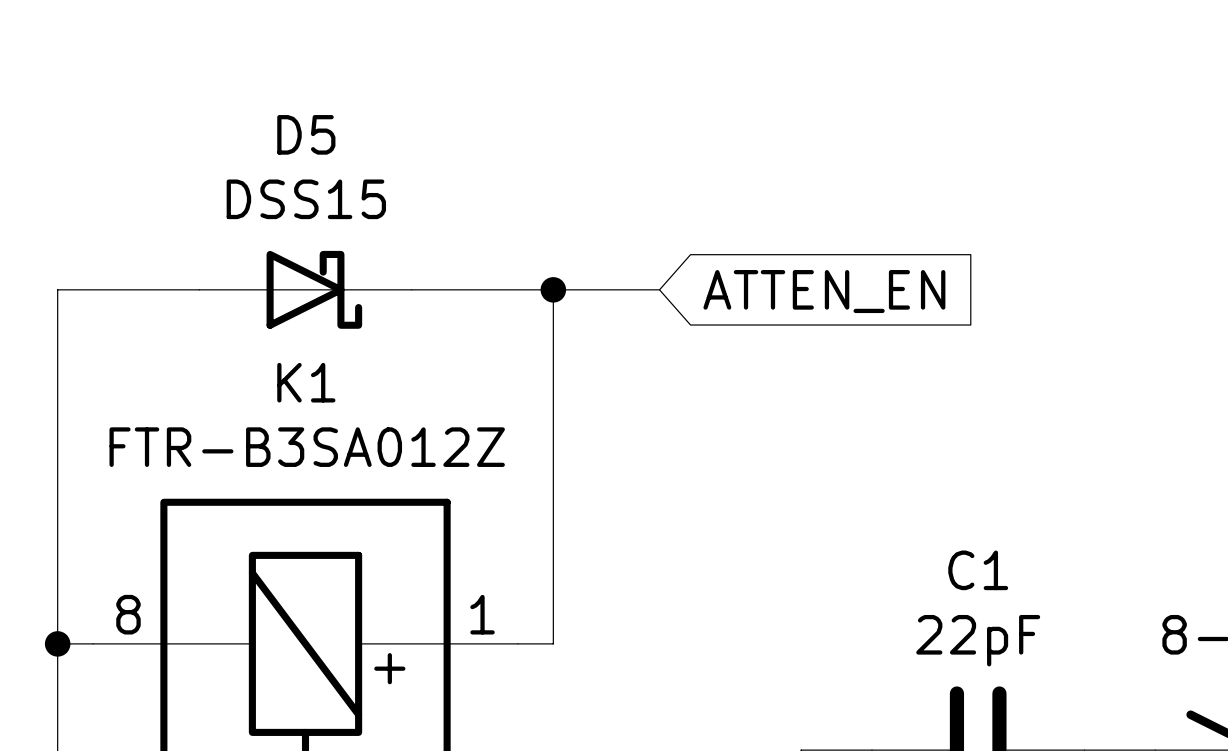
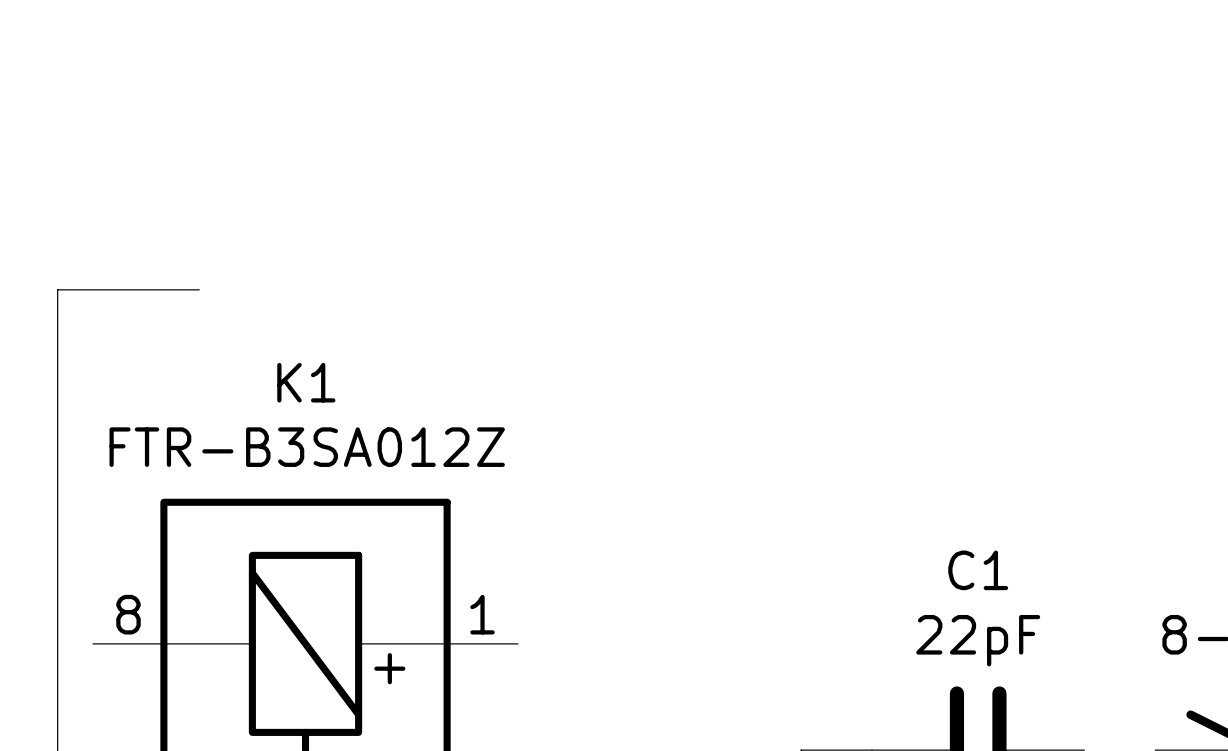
D5: DSS15 (305, 289) -> none
wire: (411, 289) (659, 289) -> none
wire: (553, 289) (553, 643) (517, 643) -> none
junction: (553, 289) -> none
global label: ATTEN_EN (824, 291) -> none
wire: (57, 643) (93, 643) -> none
junction: (57, 643) -> none
wire: (1084, 750) (1155, 750) -> none

